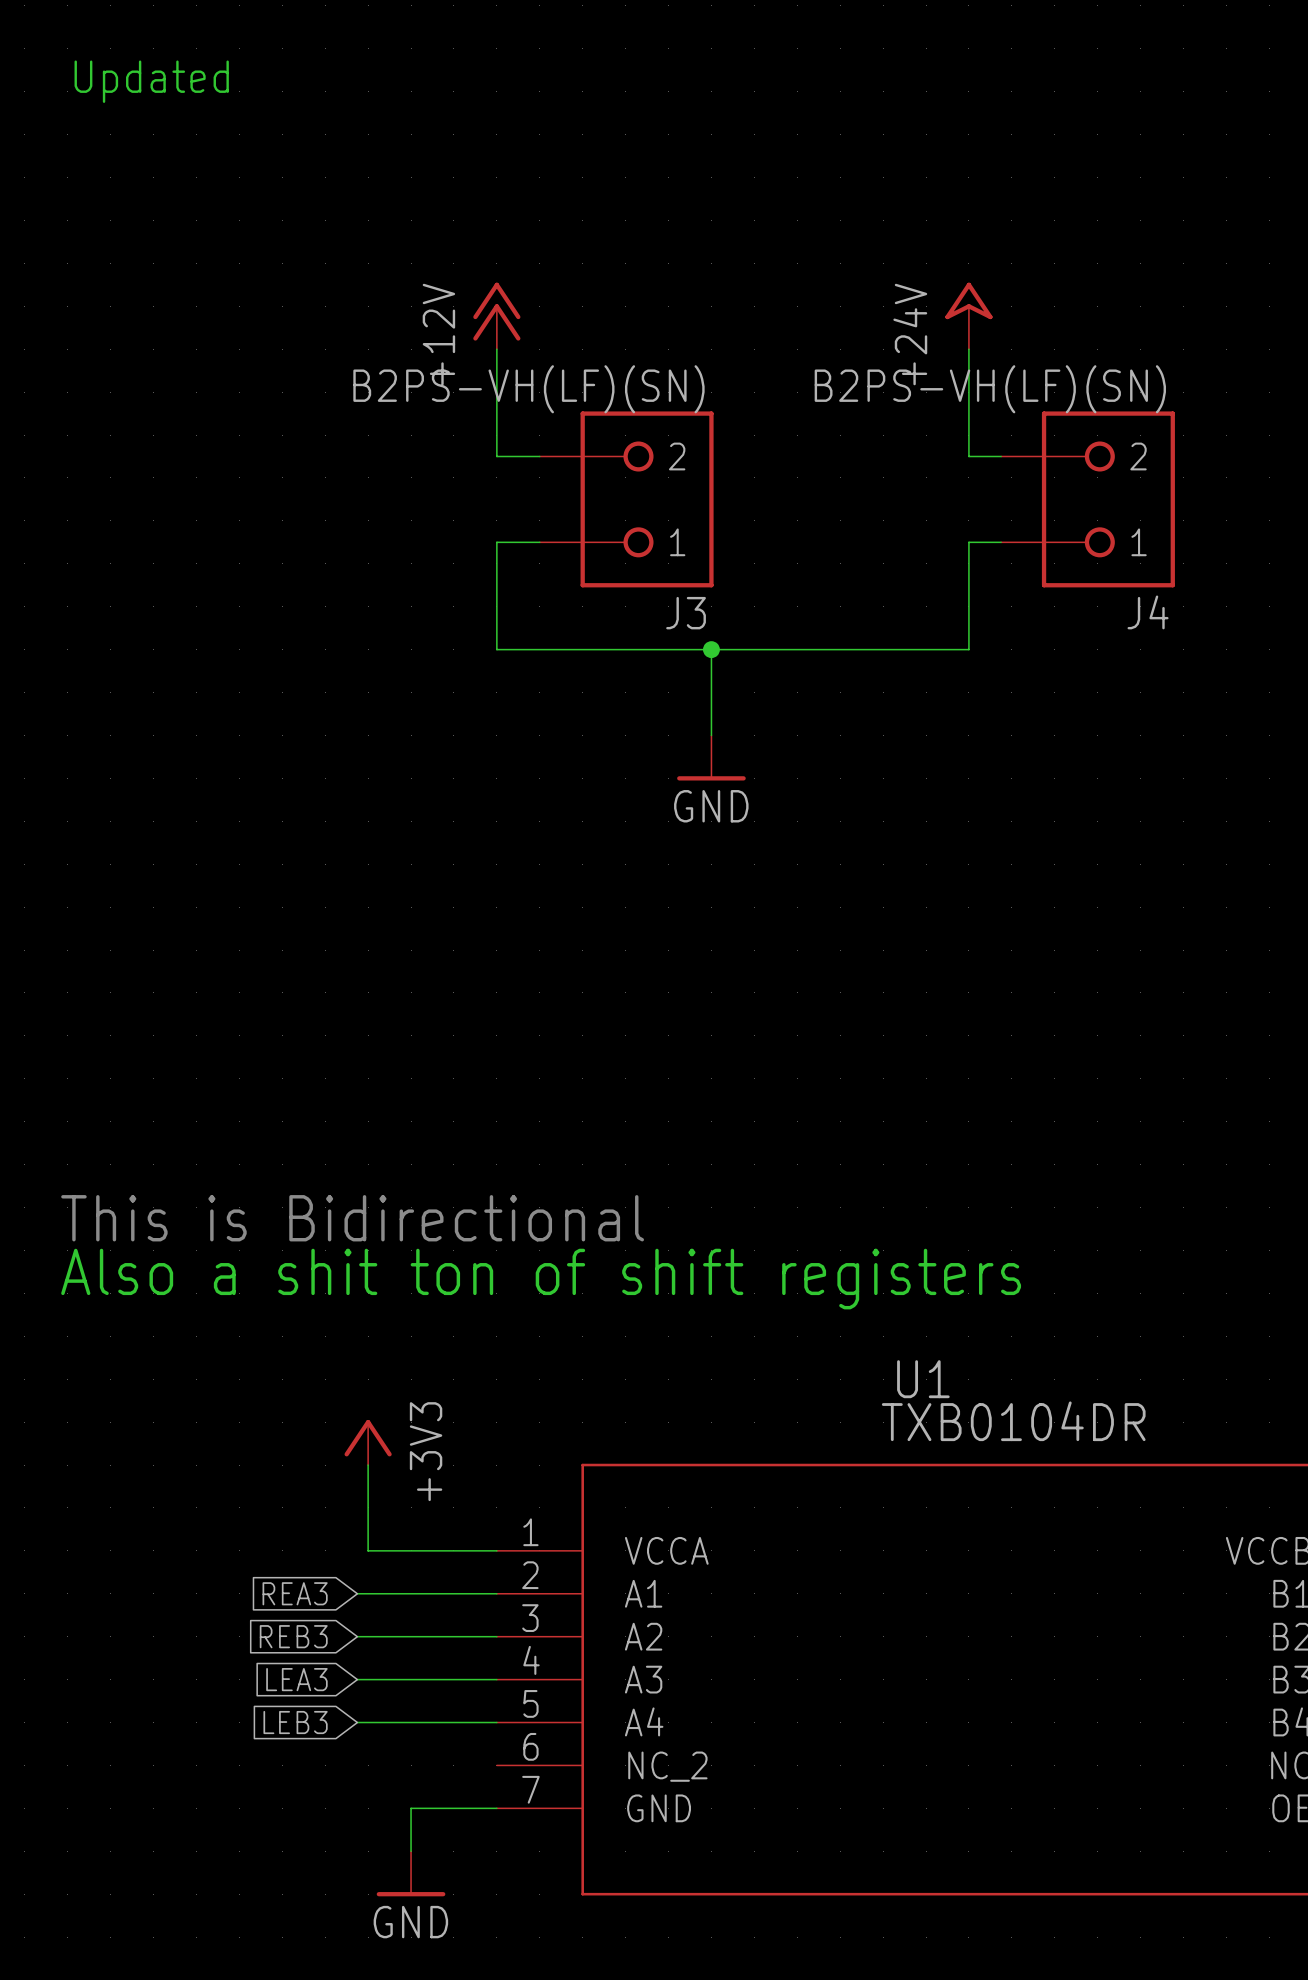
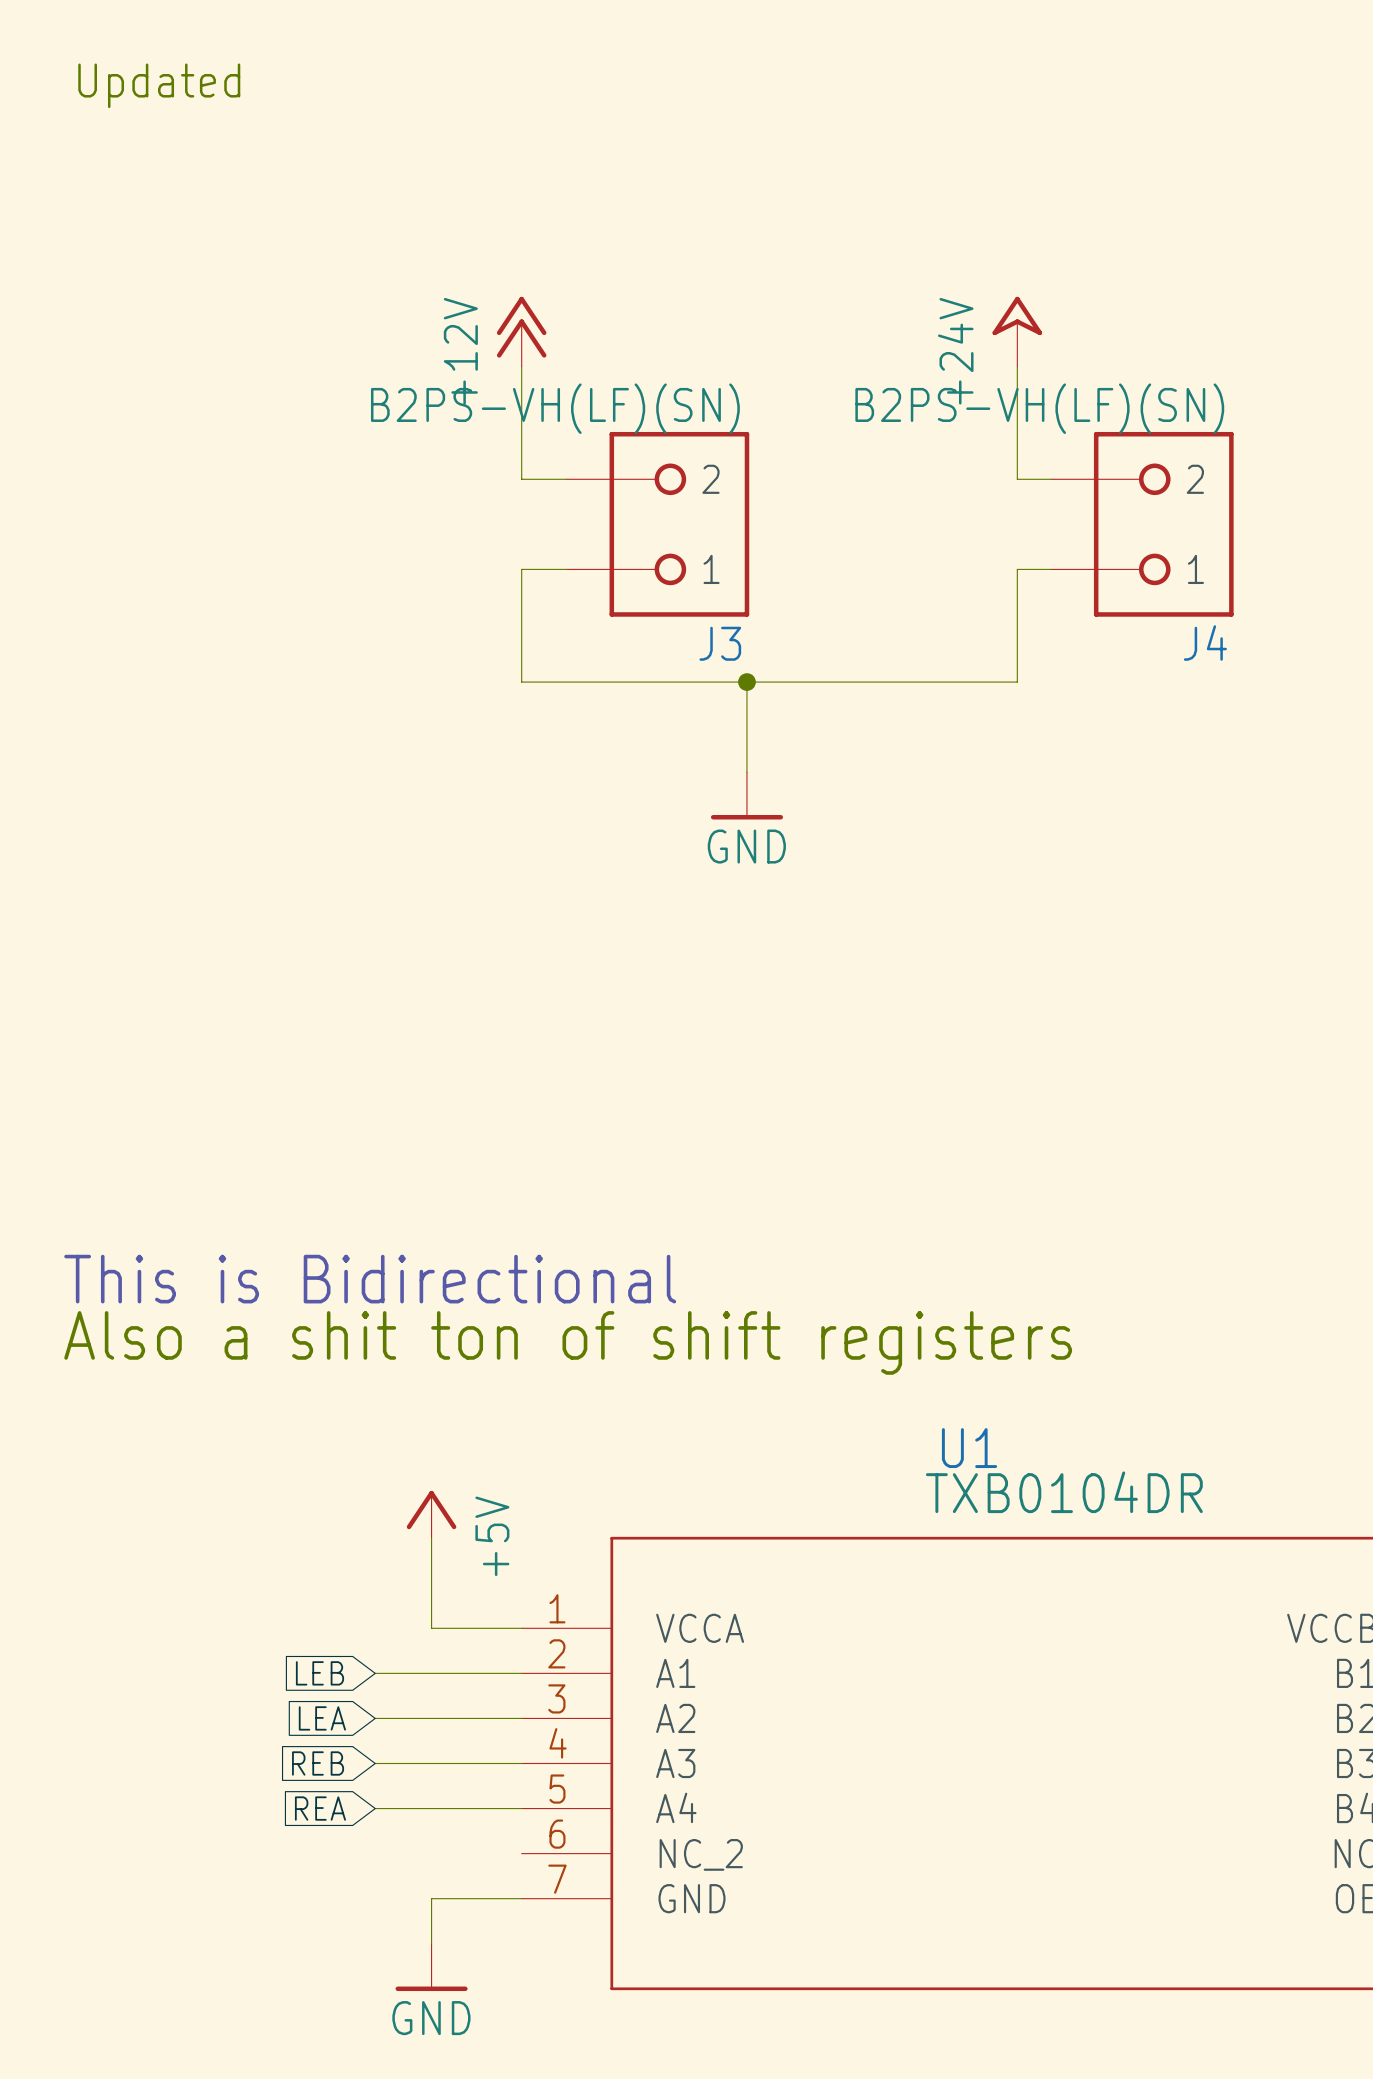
power symbol: +3V3 (368, 1442) -> none
power symbol: none -> +5V (431, 1514)
wire: (368, 1465) (368, 1550) (411, 1550) -> (431, 1538) (431, 1628)
global label: REA3 (295, 1593) -> LEB (319, 1673)
global label: REB3 (293, 1636) -> LEA (322, 1718)
global label: LEA3 (296, 1679) -> REB (318, 1763)
global label: LEB3 (295, 1722) -> REA (320, 1808)

